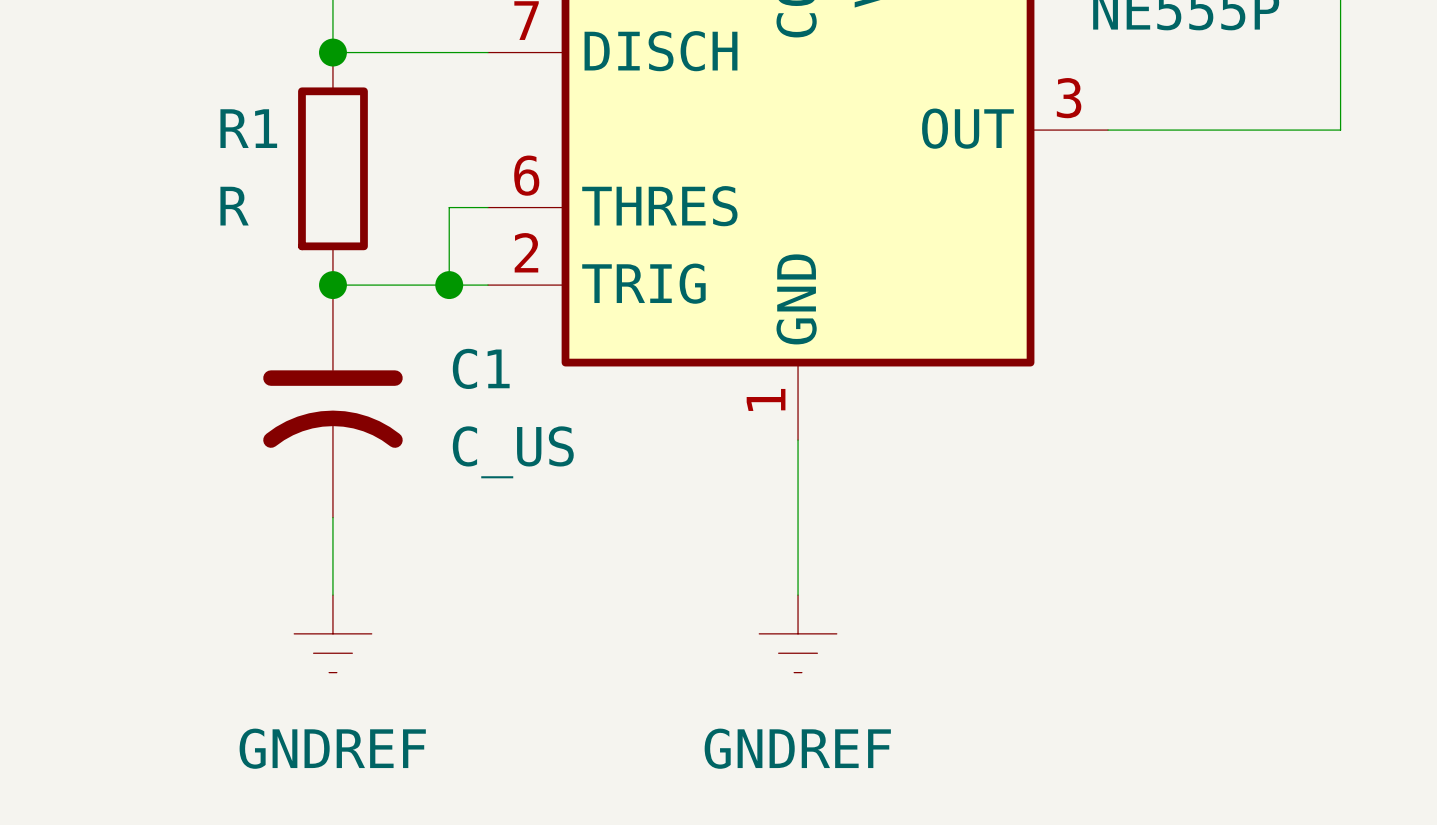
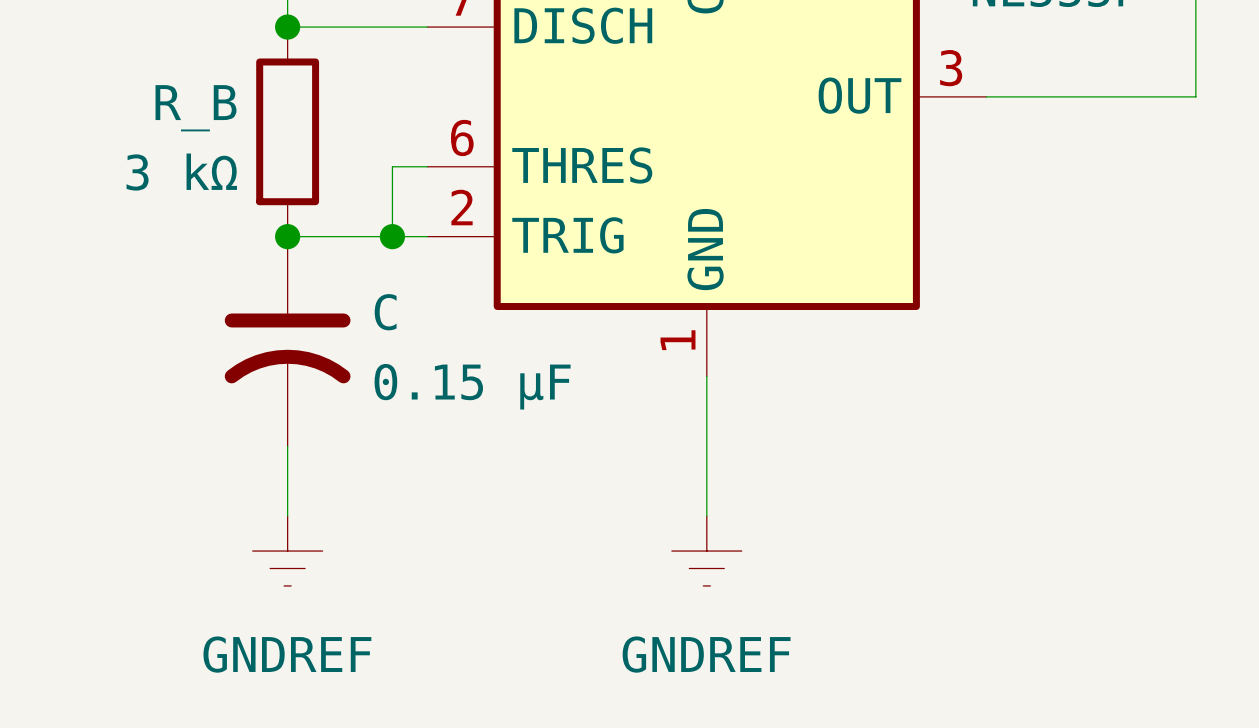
R1 name: R1 (248, 128) -> R_B (196, 108)
R1 value: R (234, 206) -> 3 kΩ (181, 172)
C1 name: C1 (481, 368) -> C (385, 312)
C1 value: C_US (513, 452) -> 0.15 µF (472, 386)

